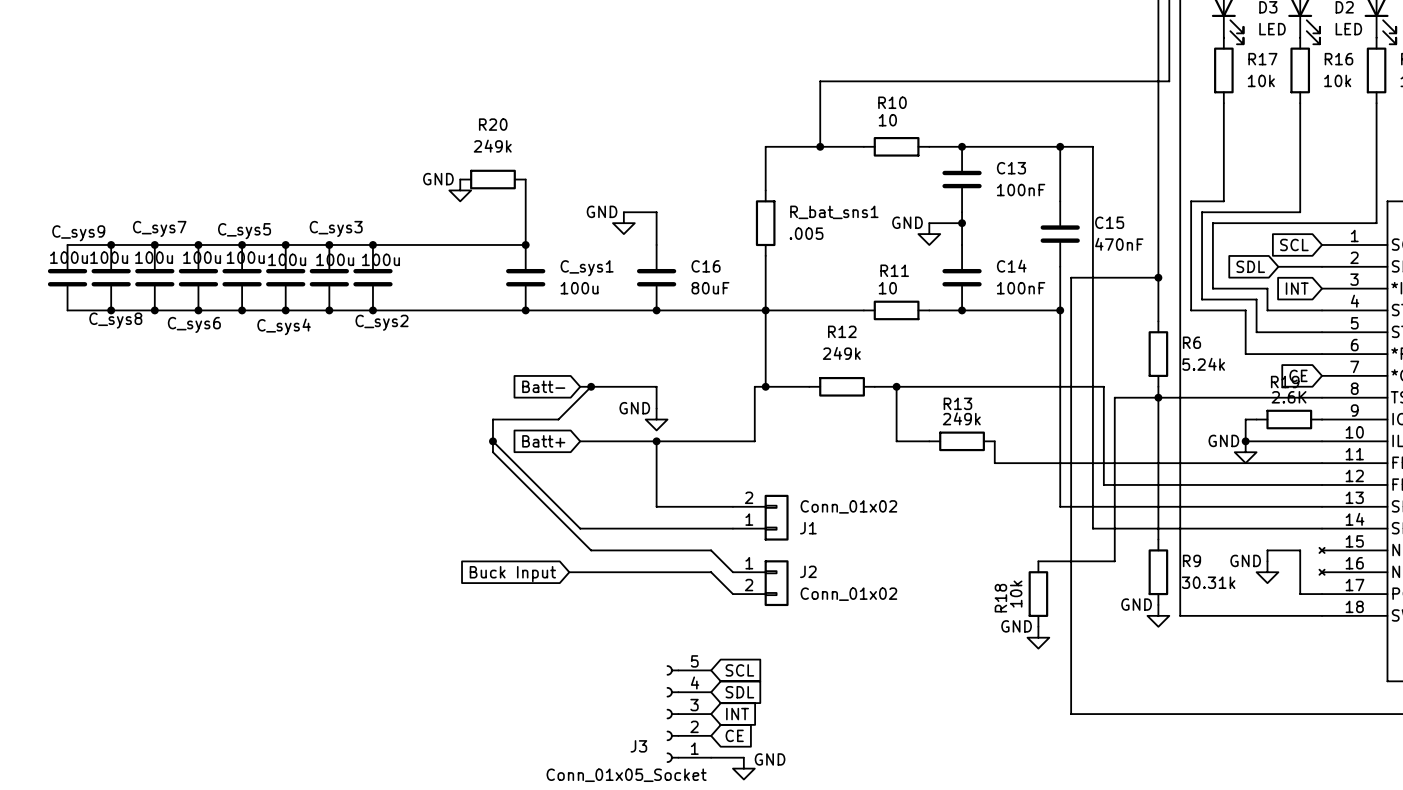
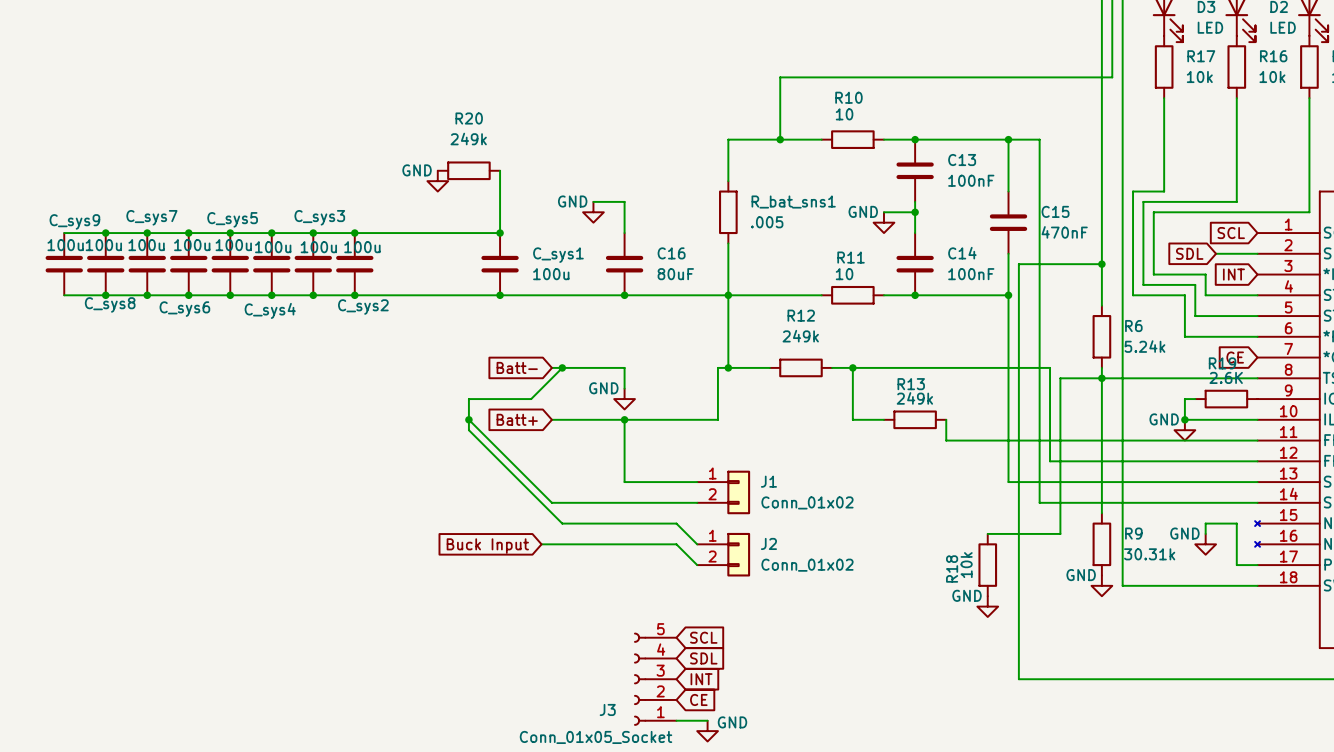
J1 flip: as is (776, 517) -> up-down (738, 492)

